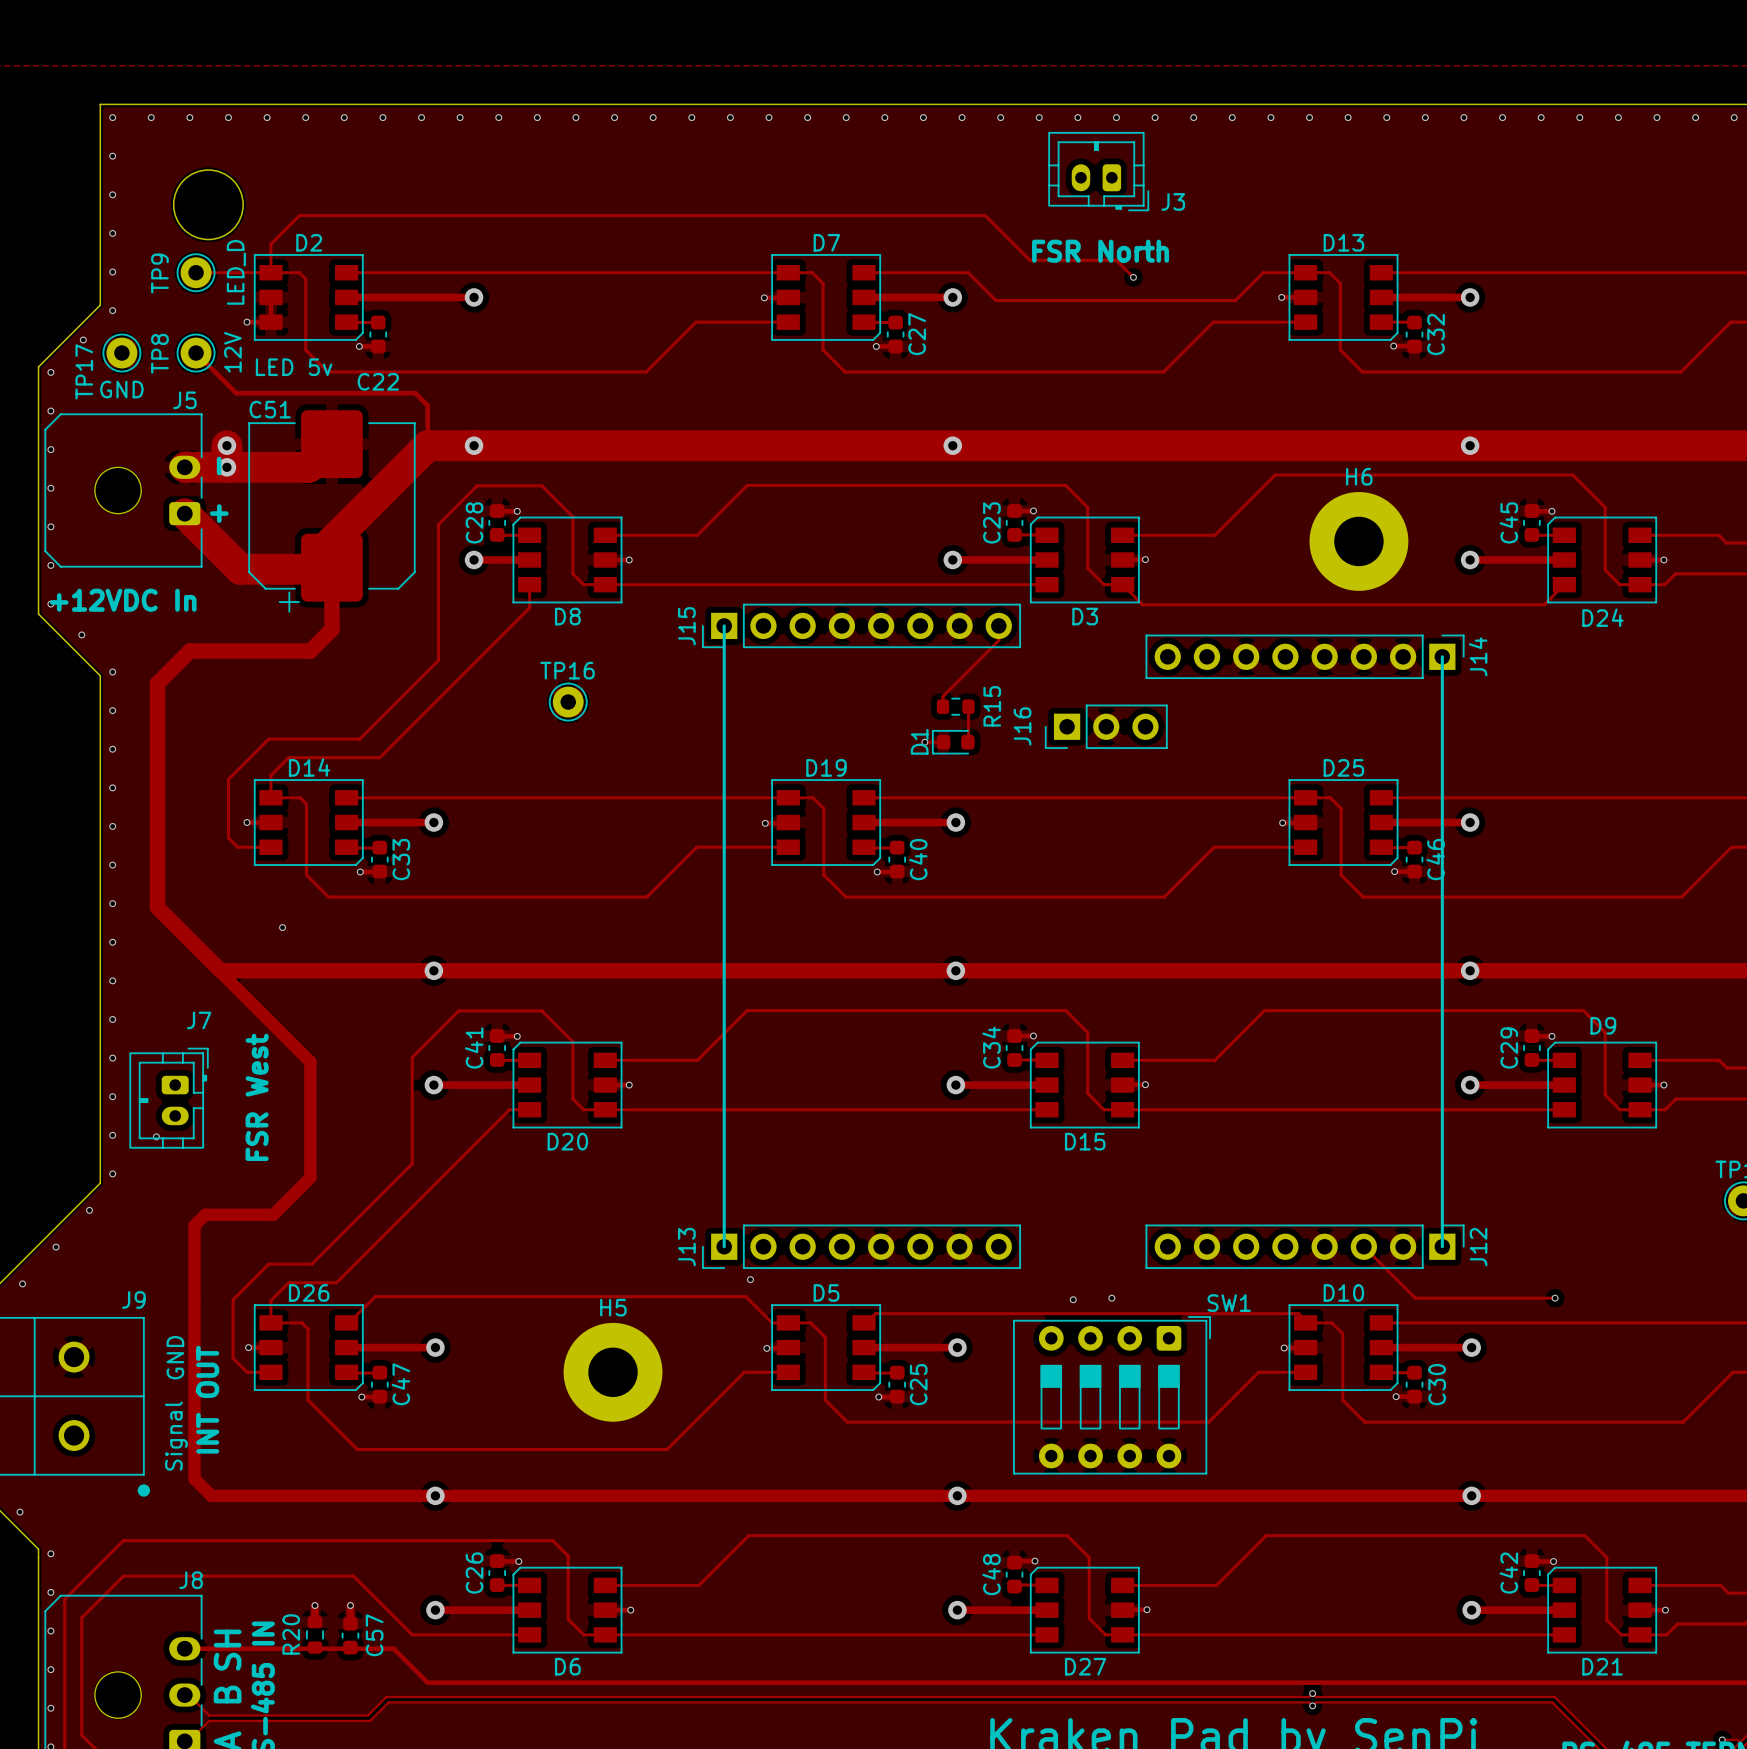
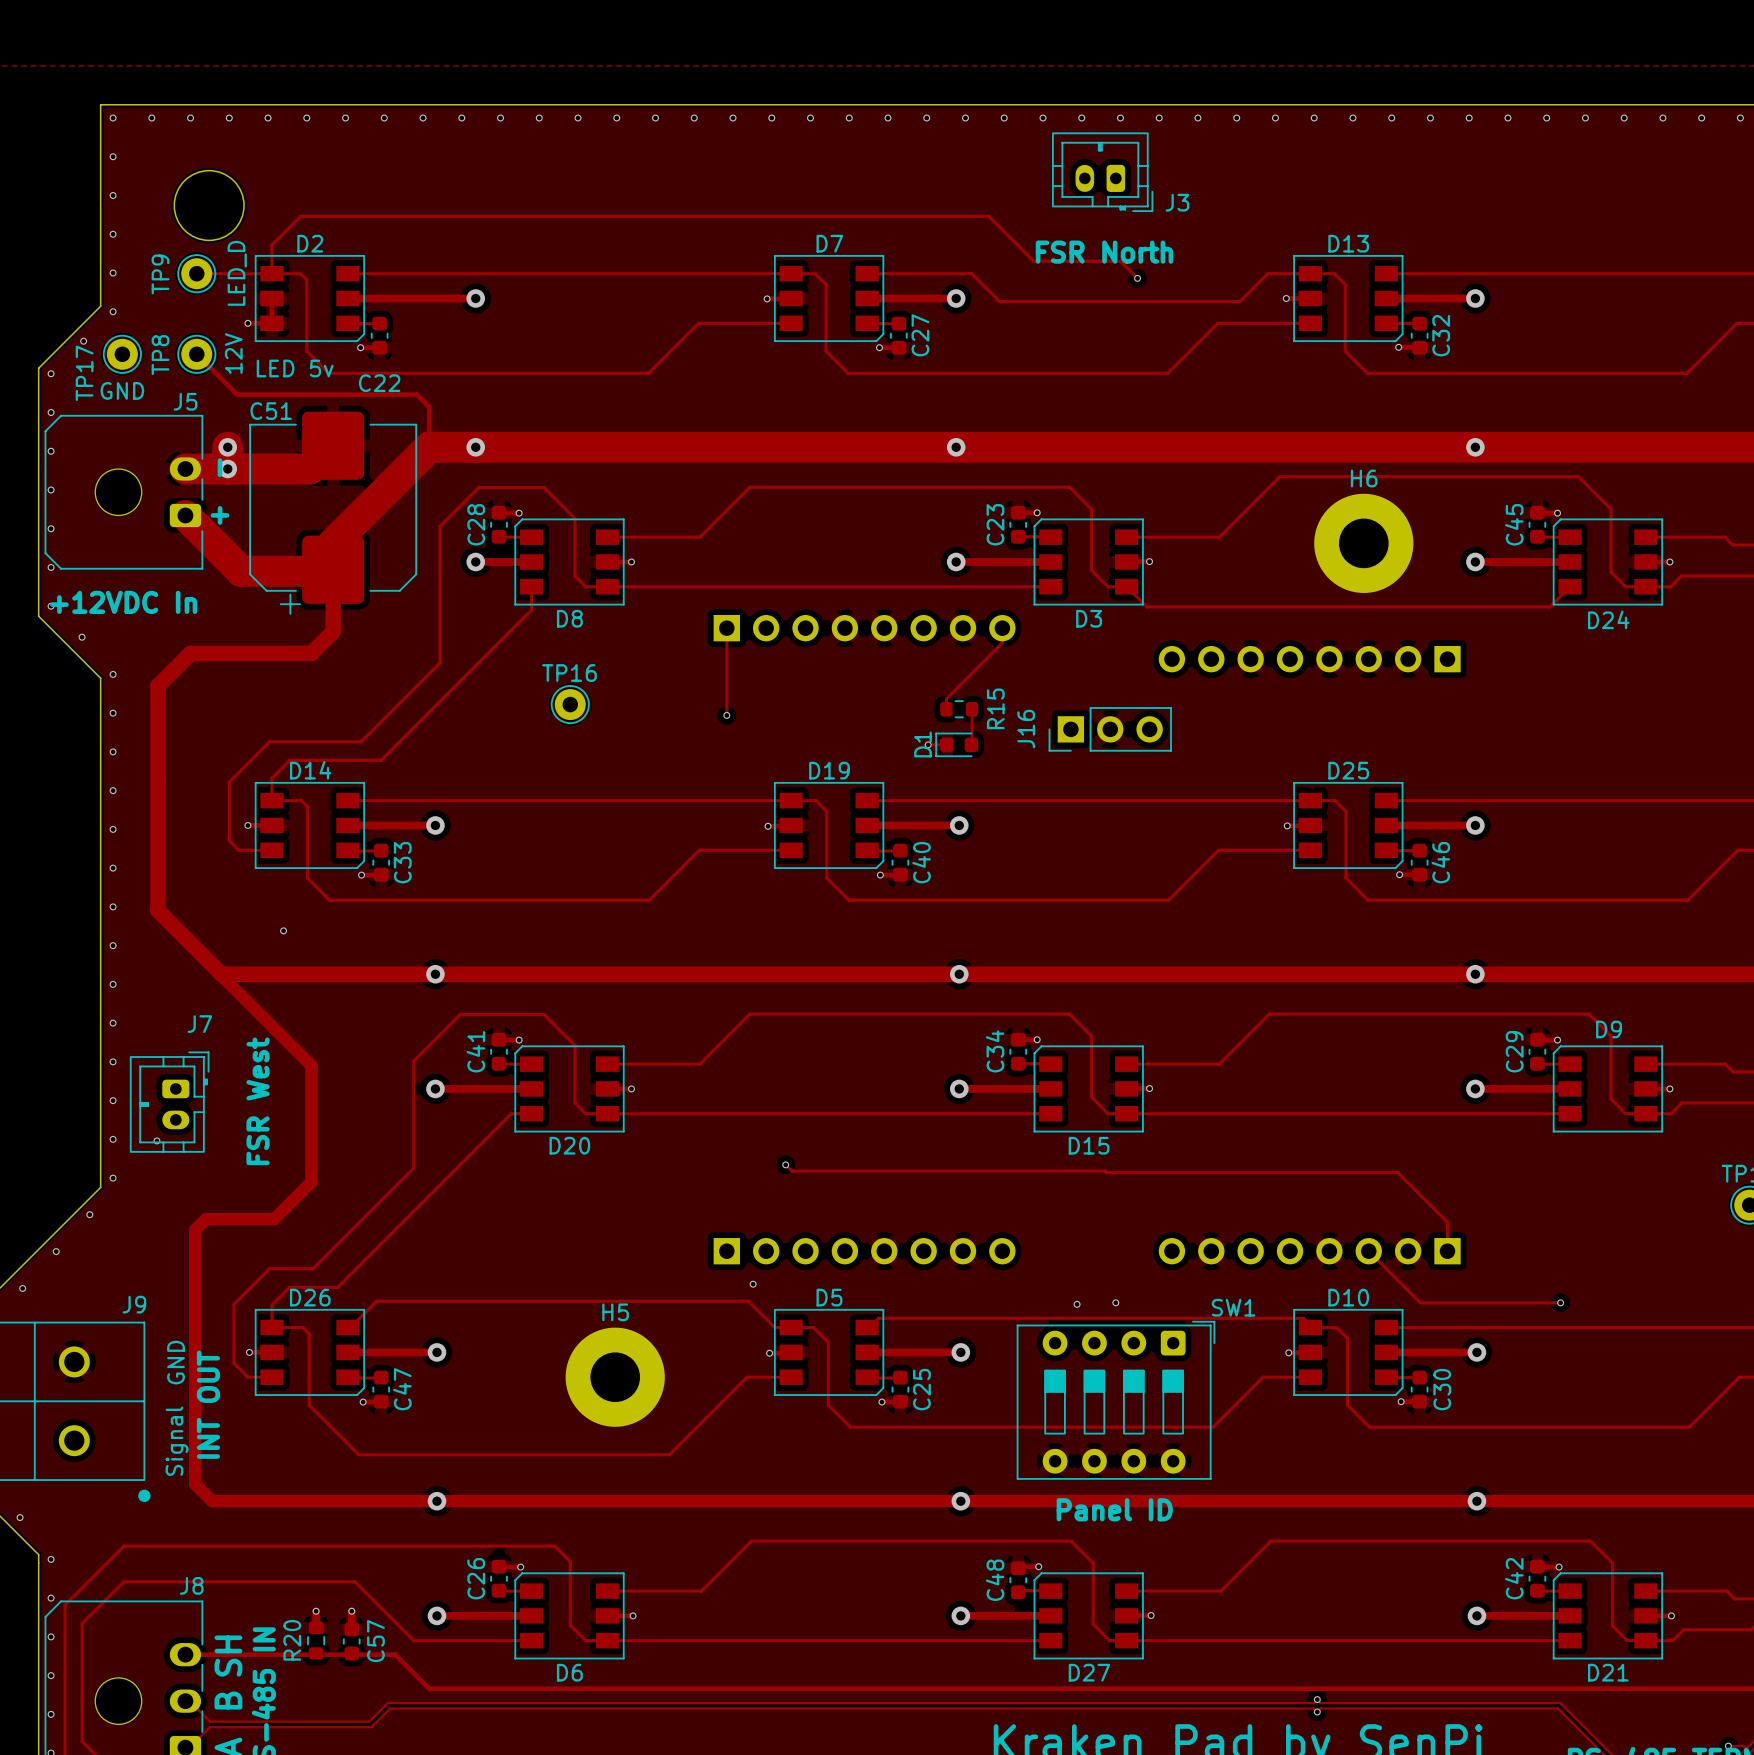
line: (724, 625) (724, 1246) -> none
track: none -> (726, 628) (726, 715)
J15 side: top (861, 625) -> bottom (864, 628)
J14 side: top (1305, 656) -> bottom (1309, 659)
line: (1442, 656) (1442, 1246) -> none
via: none -> (726, 715)
track: none -> (785, 1164) (791, 1171) (1397, 1172) (1447, 1222) (1447, 1251)
via: none -> (785, 1164)
J13 side: top (861, 1246) -> bottom (864, 1251)
J12 side: top (1305, 1246) -> bottom (1309, 1251)
text: none -> Panel ID (1114, 1509)

